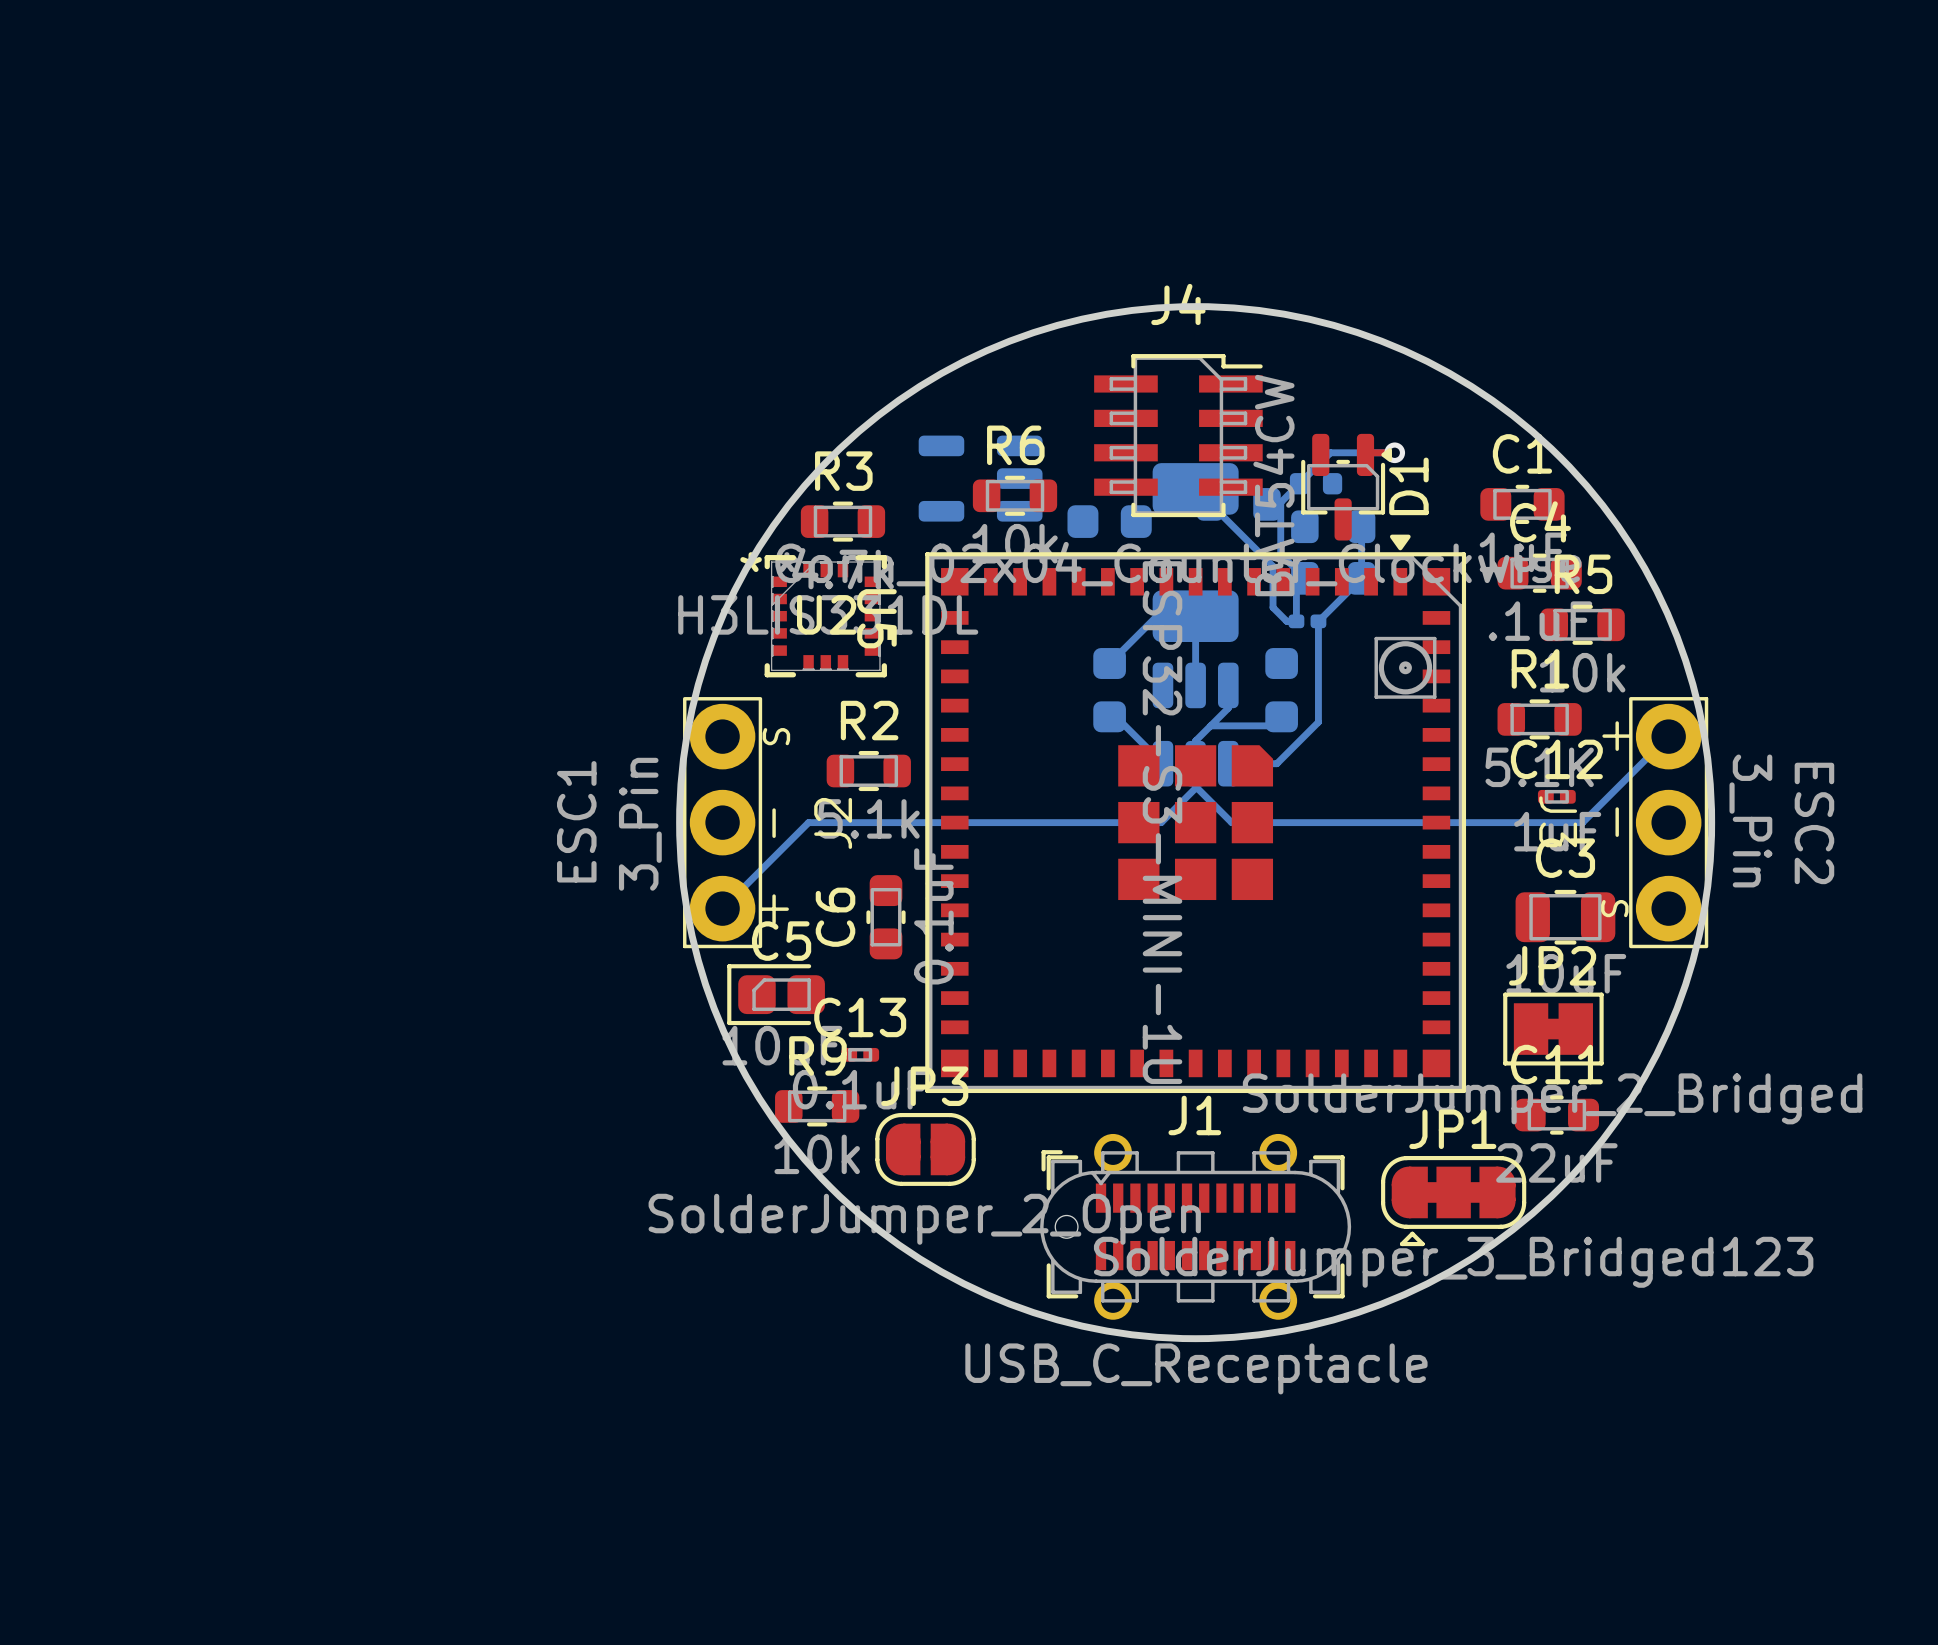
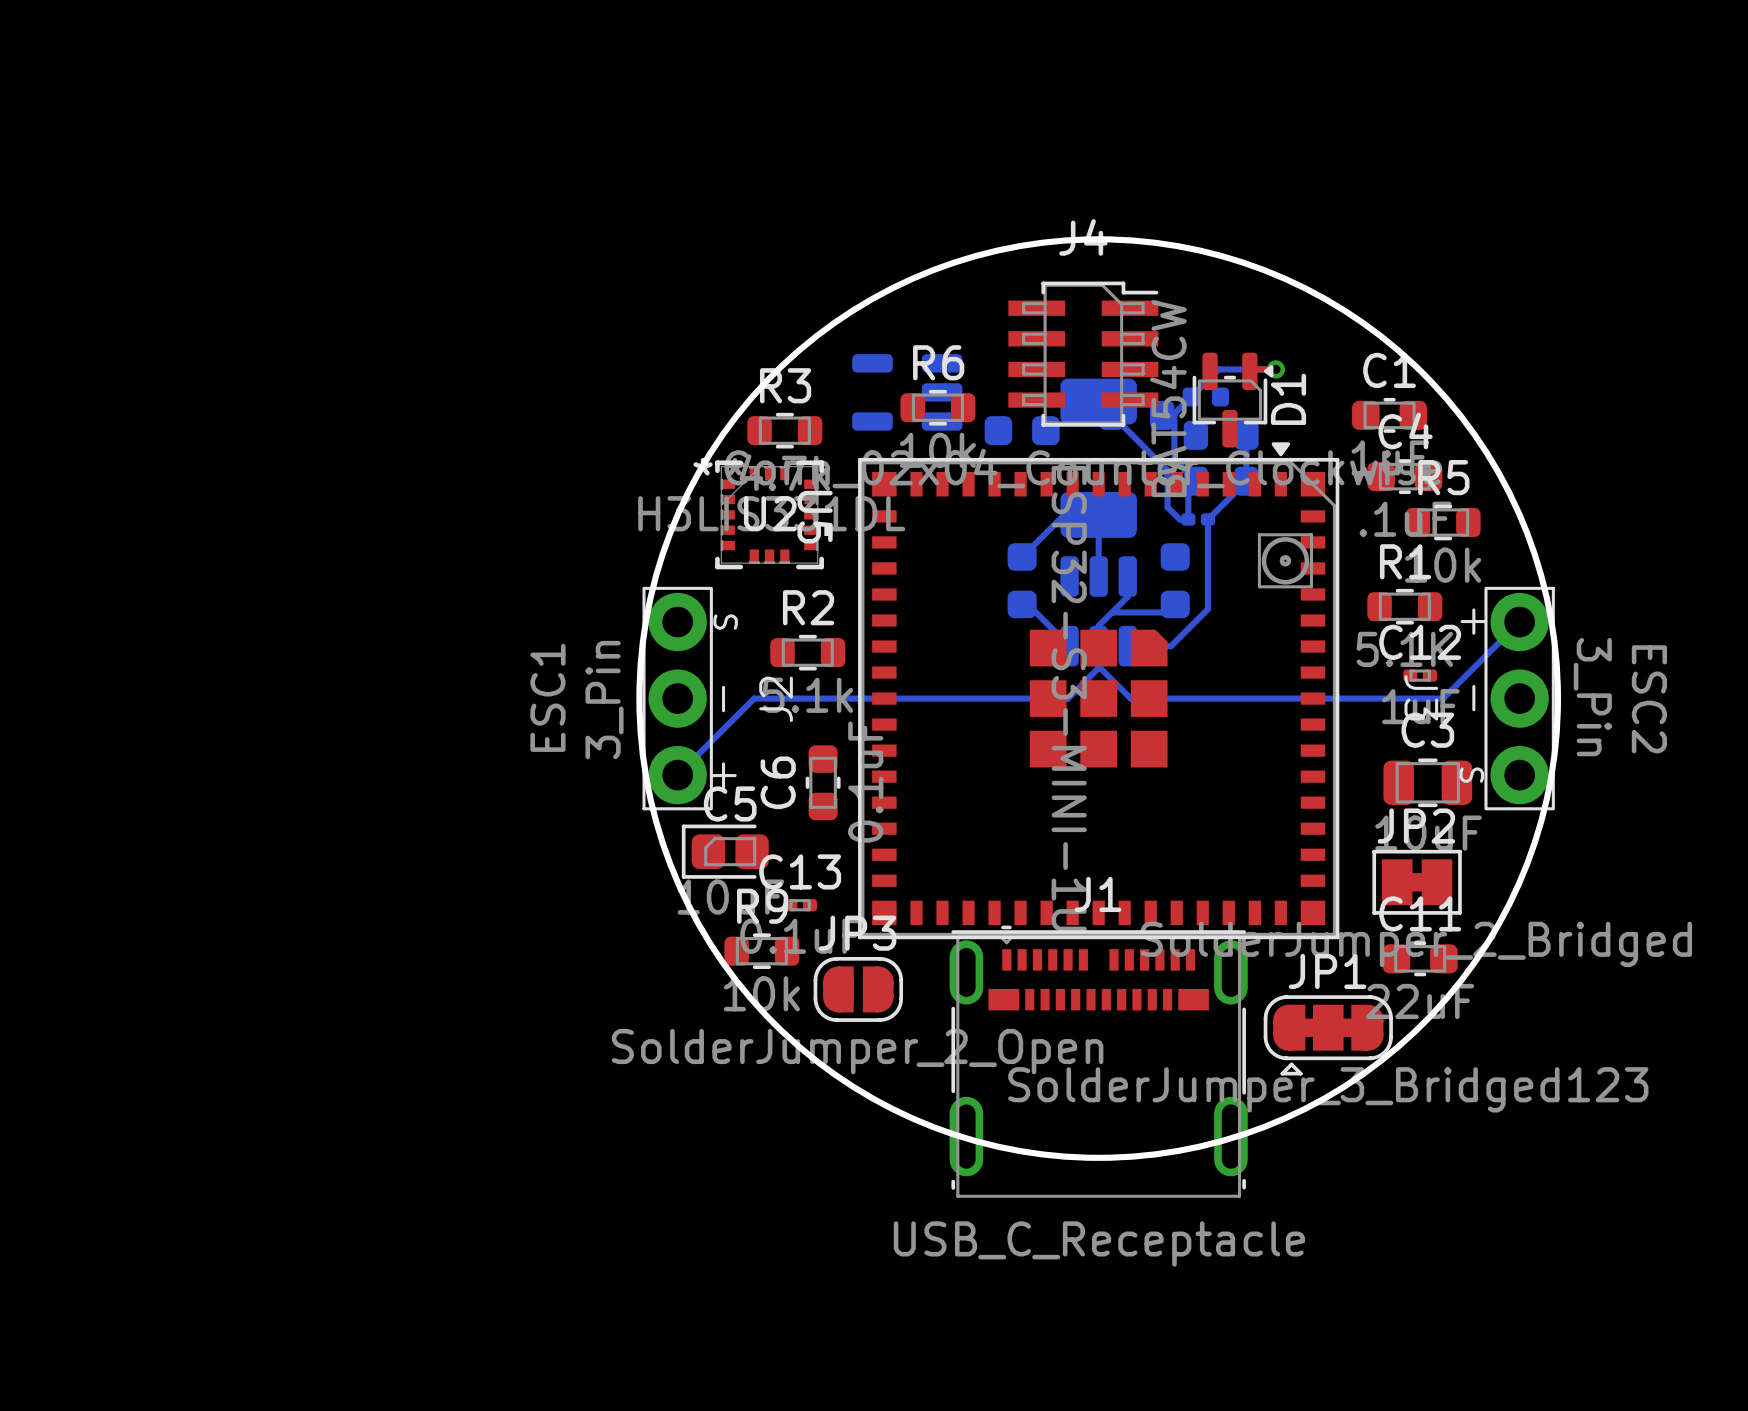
J1 name position: J1 (1194, 1115) -> J1 (1097, 894)
J1 footprint: [1040, 1133, 1352, 1320] -> [949, 925, 1248, 1198]

